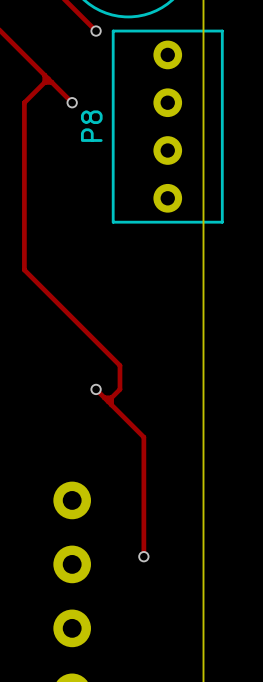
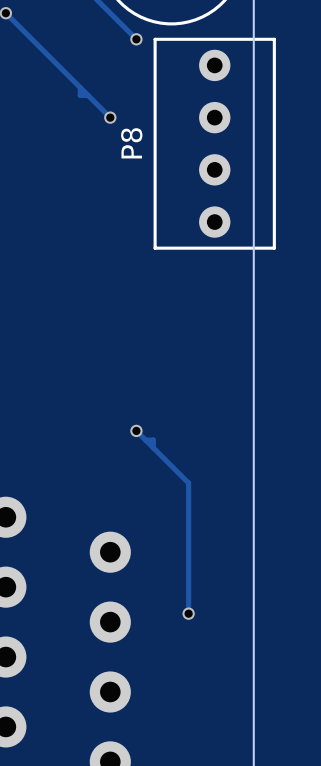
track: (48, 78) (24, 102) (24, 269) (119, 365) (119, 389) (108, 401) -> none

